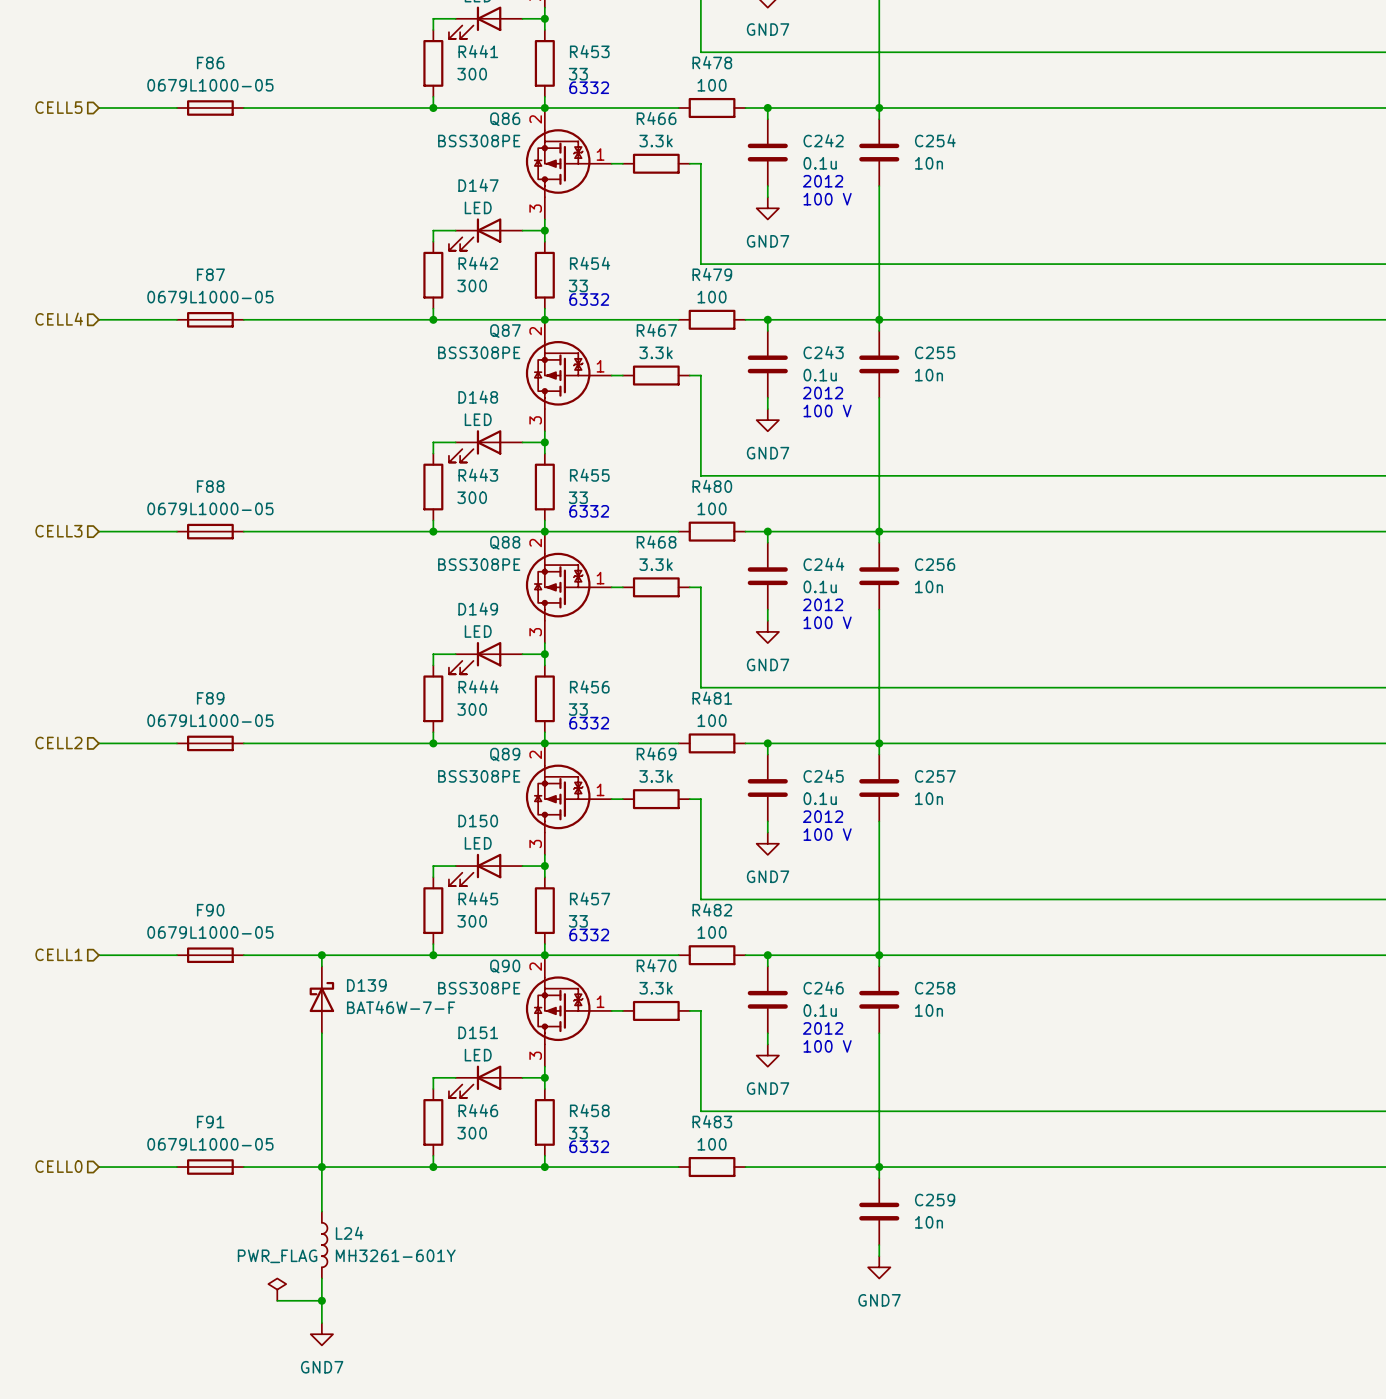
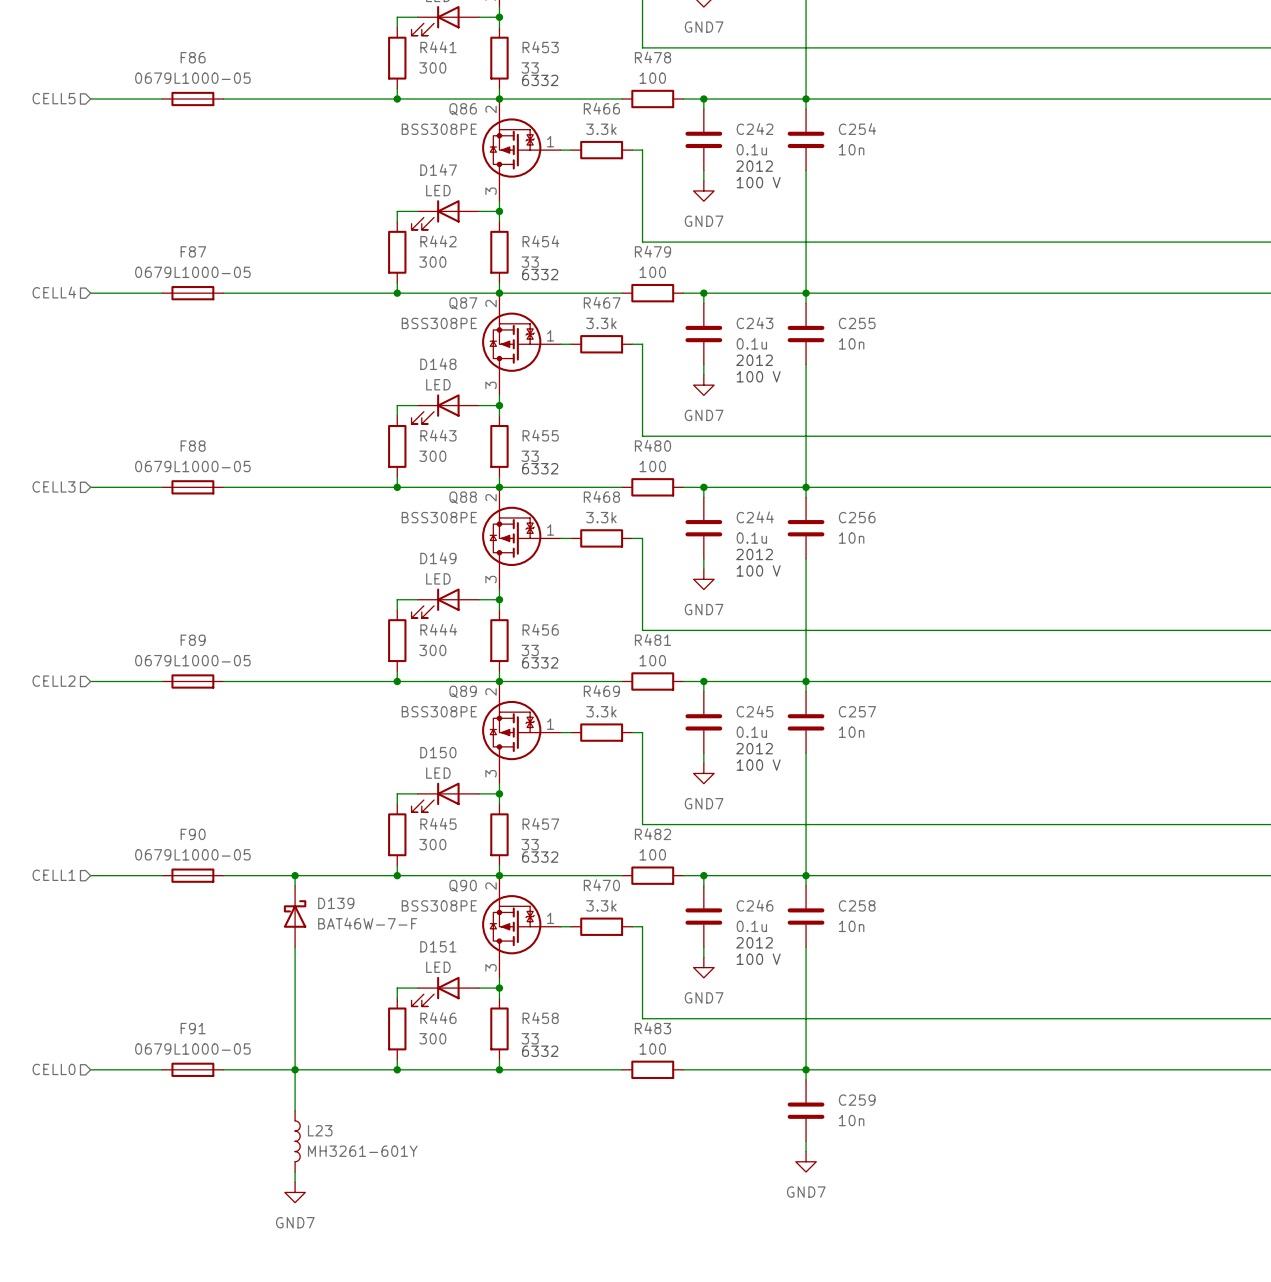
L24 name: L24 (349, 1233) -> L23 (320, 1130)
power symbol: PWR_FLAG (277, 1289) -> none
wire: (321, 1289) (321, 1323) -> none
wire: (277, 1300) (321, 1300) -> none
junction: (321, 1300) -> none
power symbol position: GND7 (321, 1334) -> GND7 (295, 1192)

